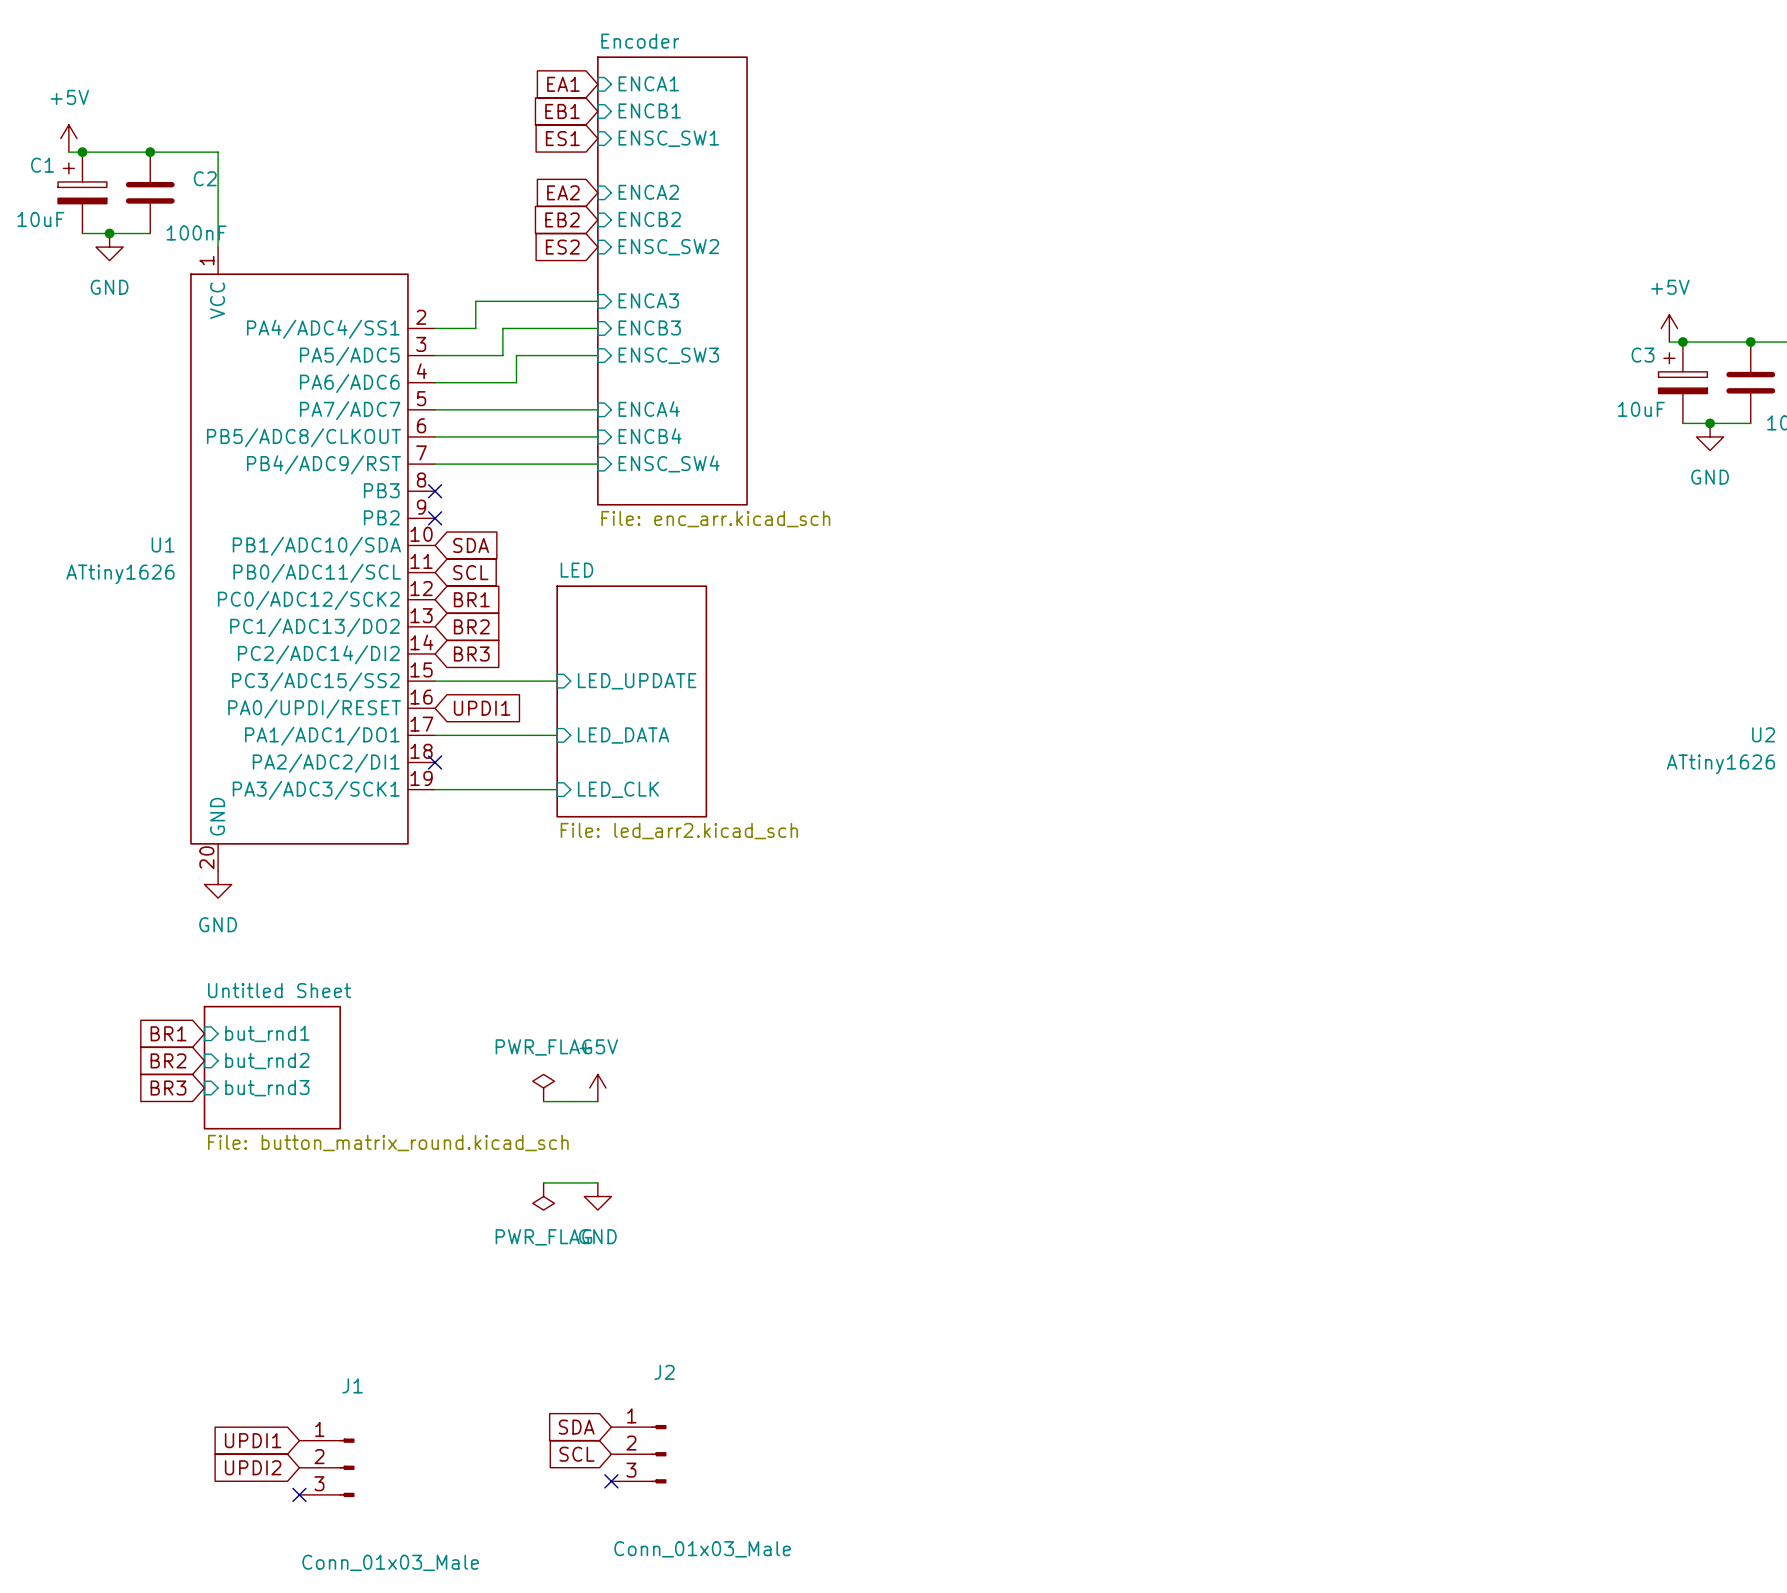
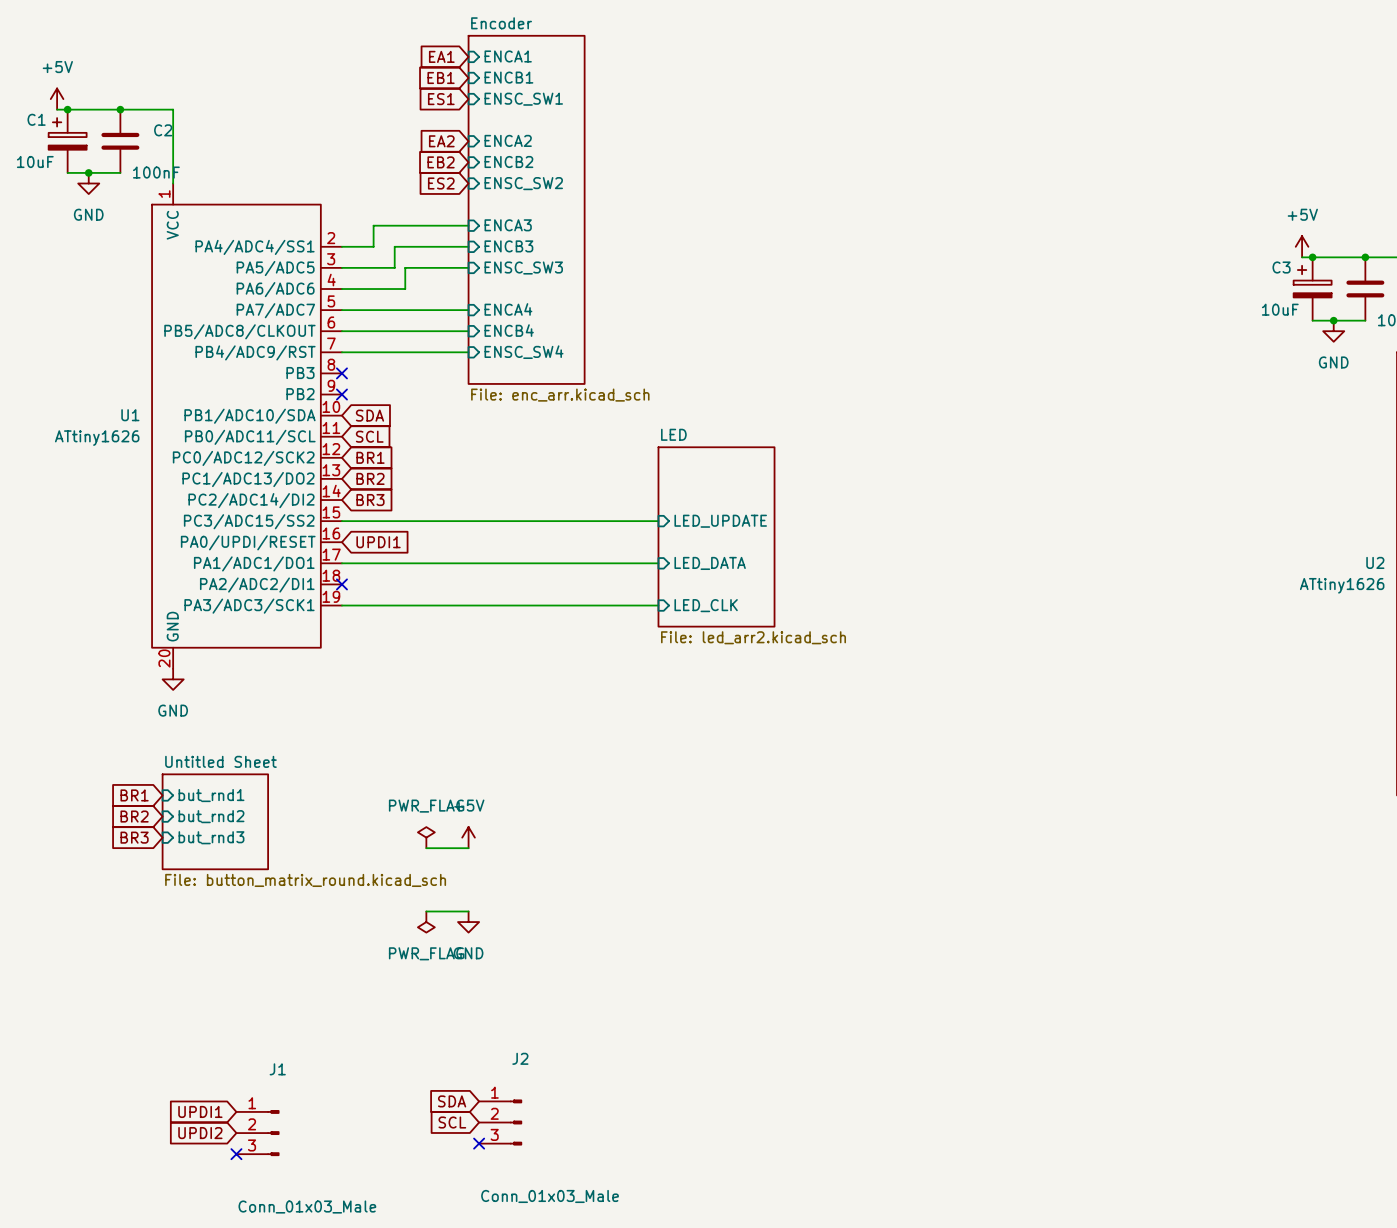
wire: none -> (436, 521) (658, 521)
sheet pin: LED_UPDATE (637, 681) -> none
sheet pin: none -> LED_UPDATE (720, 521)
sheet LED: File: led_arr2.kicad_sch (631, 701) -> none
sheet LED: none -> File: led_arr2.kicad_sch (716, 536)
wire: none -> (436, 563) (658, 563)
sheet pin: LED_DATA (623, 735) -> none
sheet pin: none -> LED_DATA (710, 563)
wire: none -> (436, 605) (658, 605)
sheet pin: LED_CLK (618, 789) -> none
sheet pin: none -> LED_CLK (706, 605)

